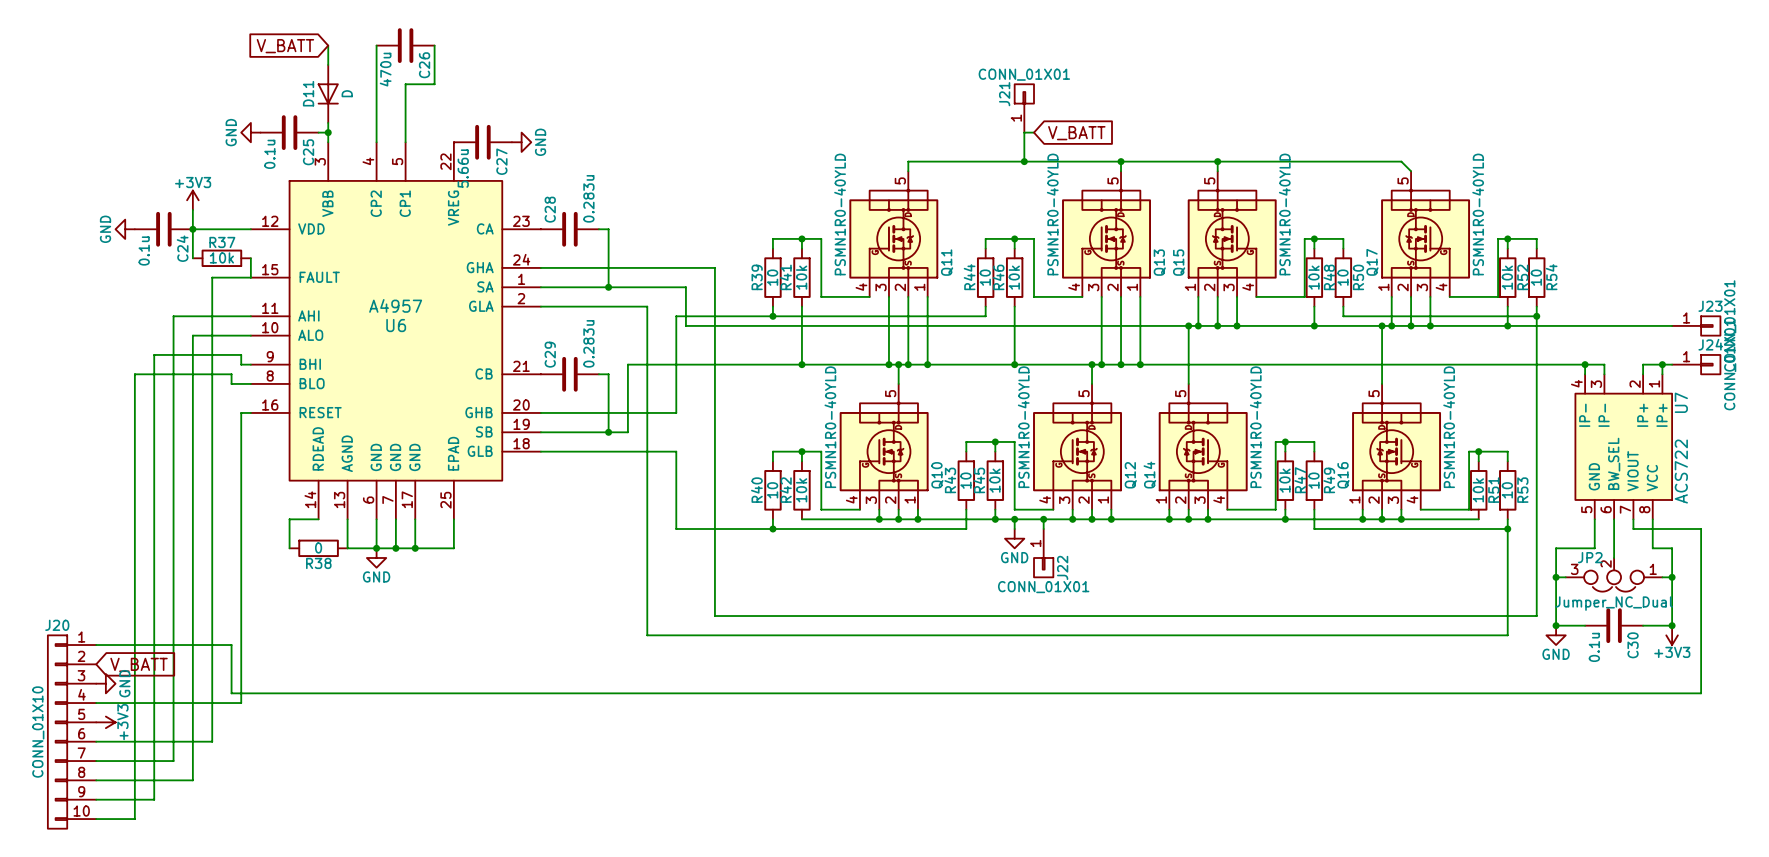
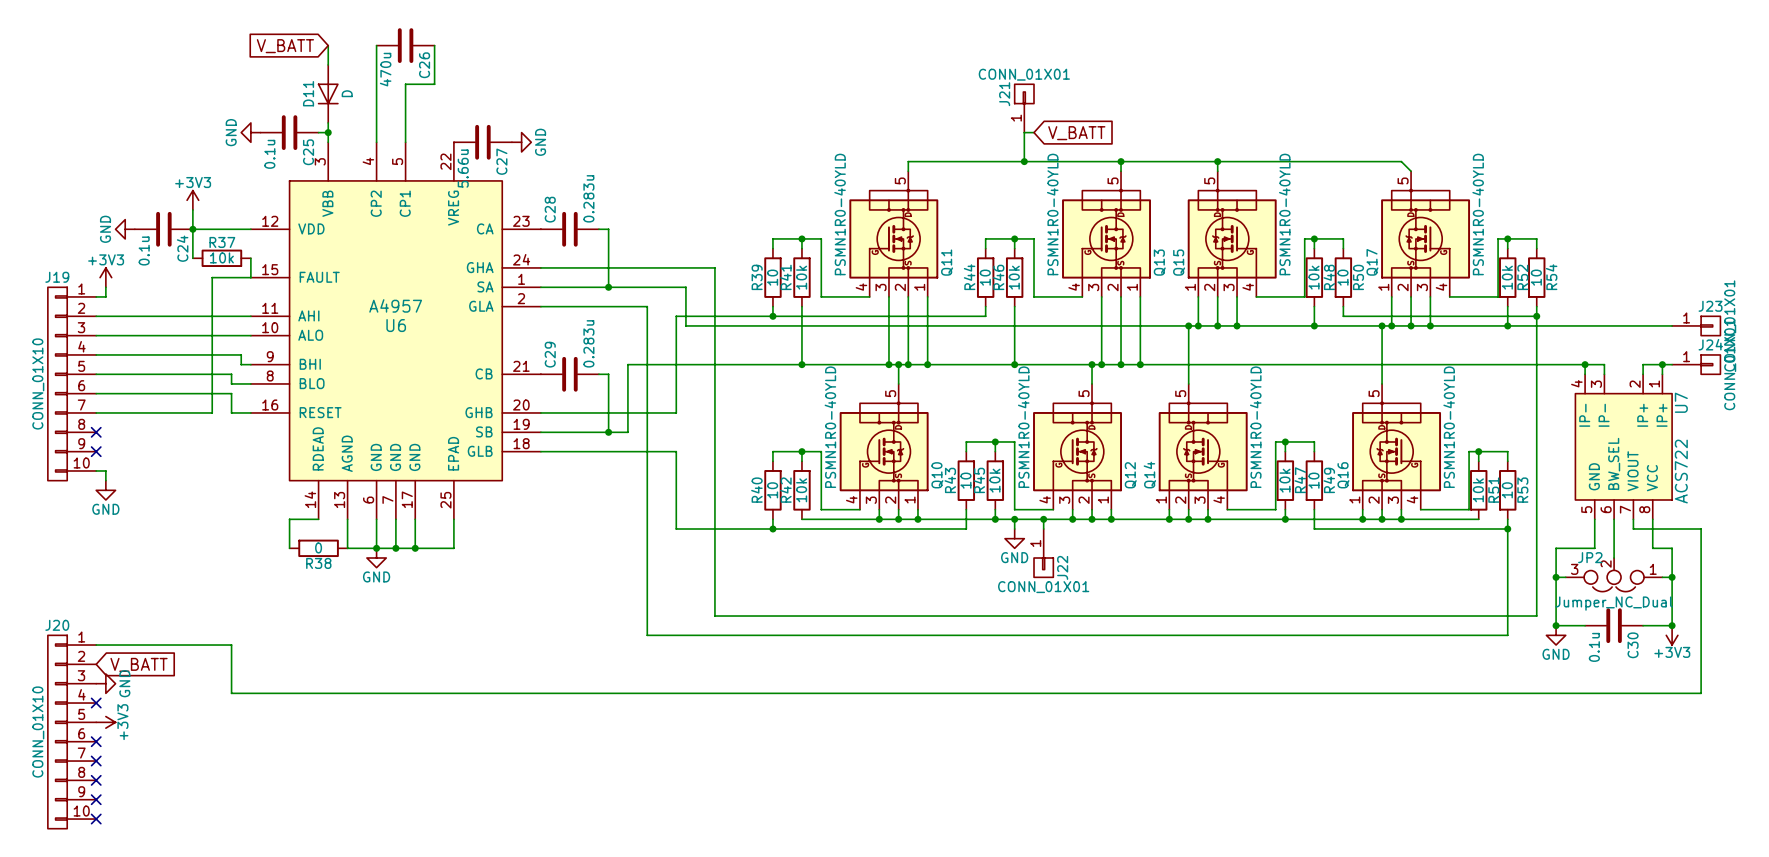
power symbol: none -> +3V3 (105, 277)
wire: none -> (105, 287) (105, 296) (96, 296)
wire: (173, 316) (173, 761) (96, 761) -> (173, 316) (96, 316)
wire: (192, 335) (192, 780) (96, 780) -> (192, 335) (96, 335)
wire: (154, 354) (154, 799) (96, 799) -> (154, 354) (96, 354)
wire: (134, 374) (134, 819) (96, 819) -> (134, 374) (96, 374)
J19: none -> CONN_01X10 (72, 383)
wire: (212, 412) (212, 741) (96, 741) -> (212, 412) (96, 412)
wire: (241, 412) (241, 703) (96, 703) -> (241, 412) (231, 412) (231, 393) (96, 393)
no-connect mark: none -> (96, 432)
no-connect mark: none -> (96, 451)
wire: none -> (96, 470) (105, 470) (105, 480)
power symbol: none -> GND (105, 490)
no-connect mark: none -> (96, 703)
no-connect mark: none -> (96, 741)
no-connect mark: none -> (96, 761)
no-connect mark: none -> (96, 780)
no-connect mark: none -> (96, 799)
no-connect mark: none -> (96, 819)

